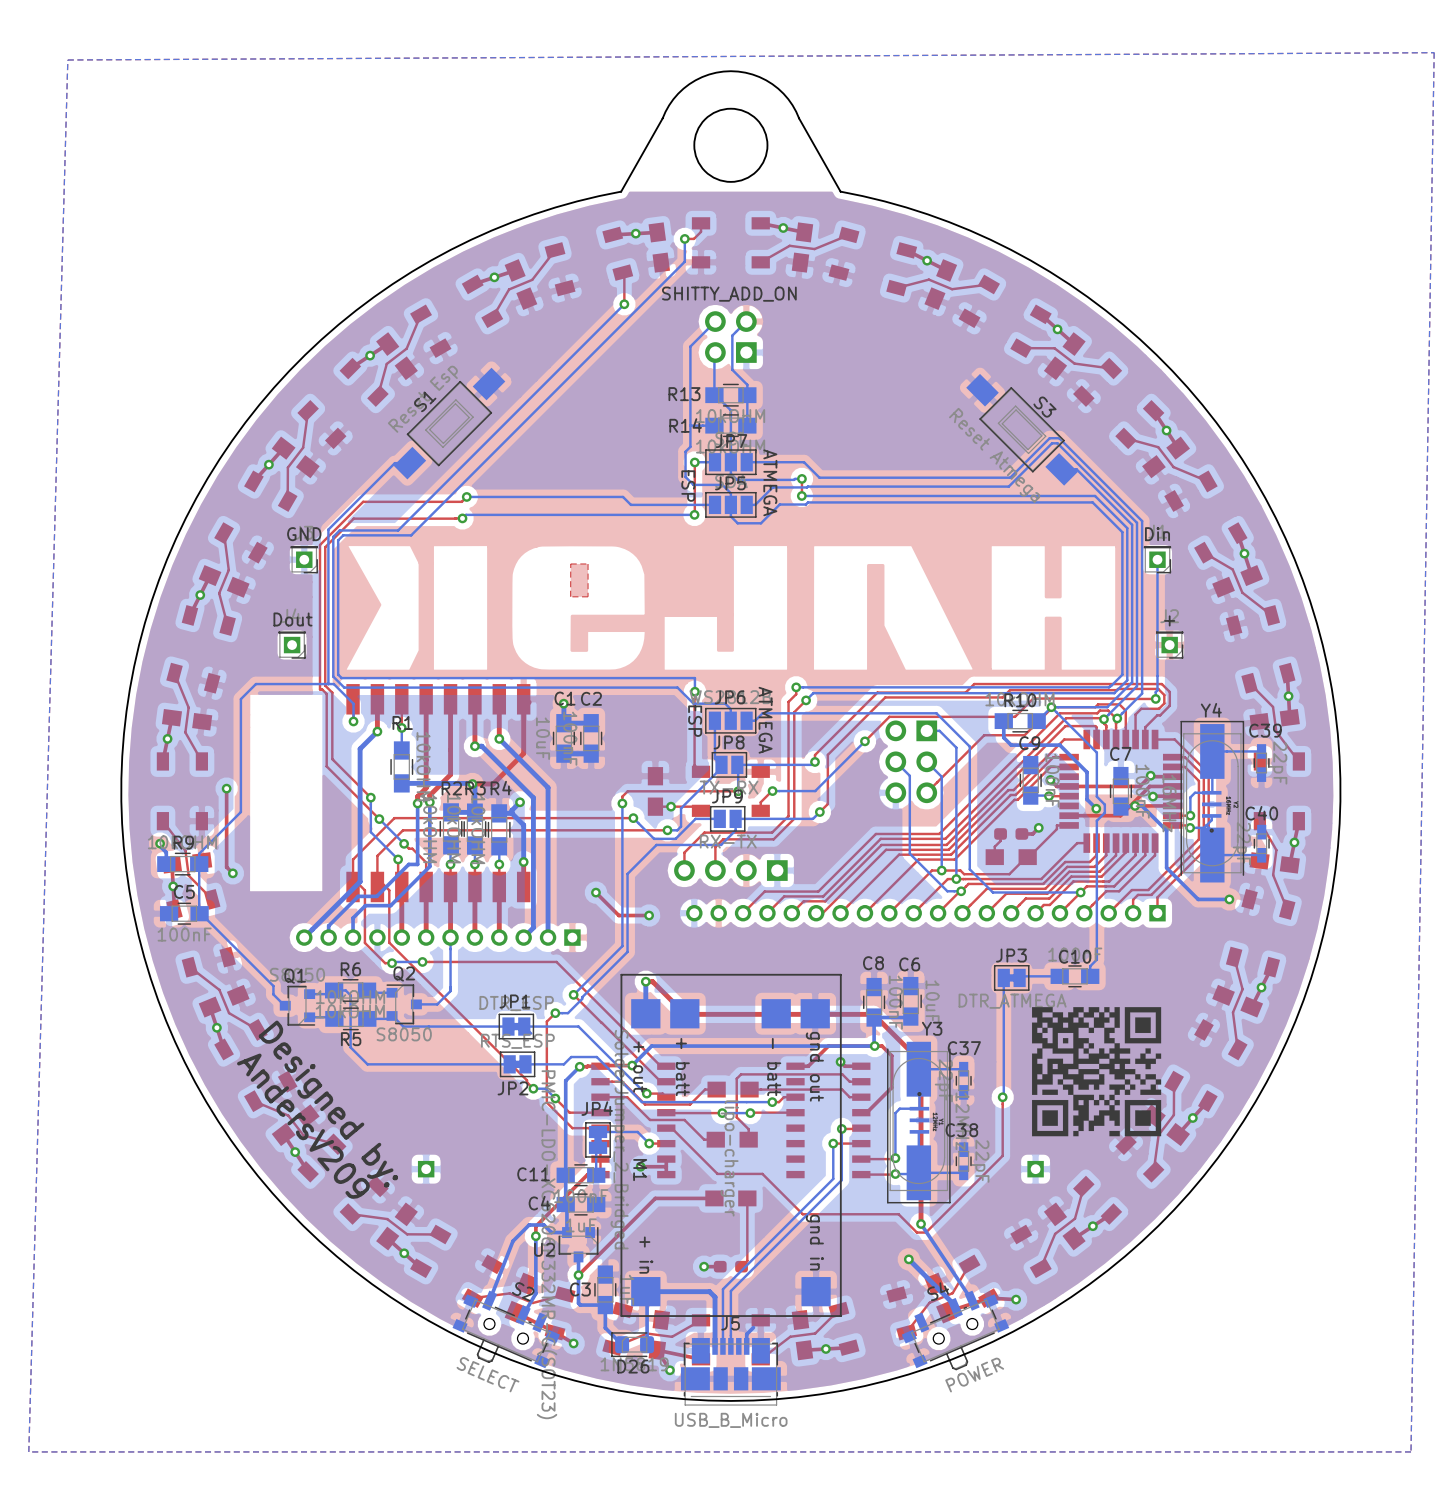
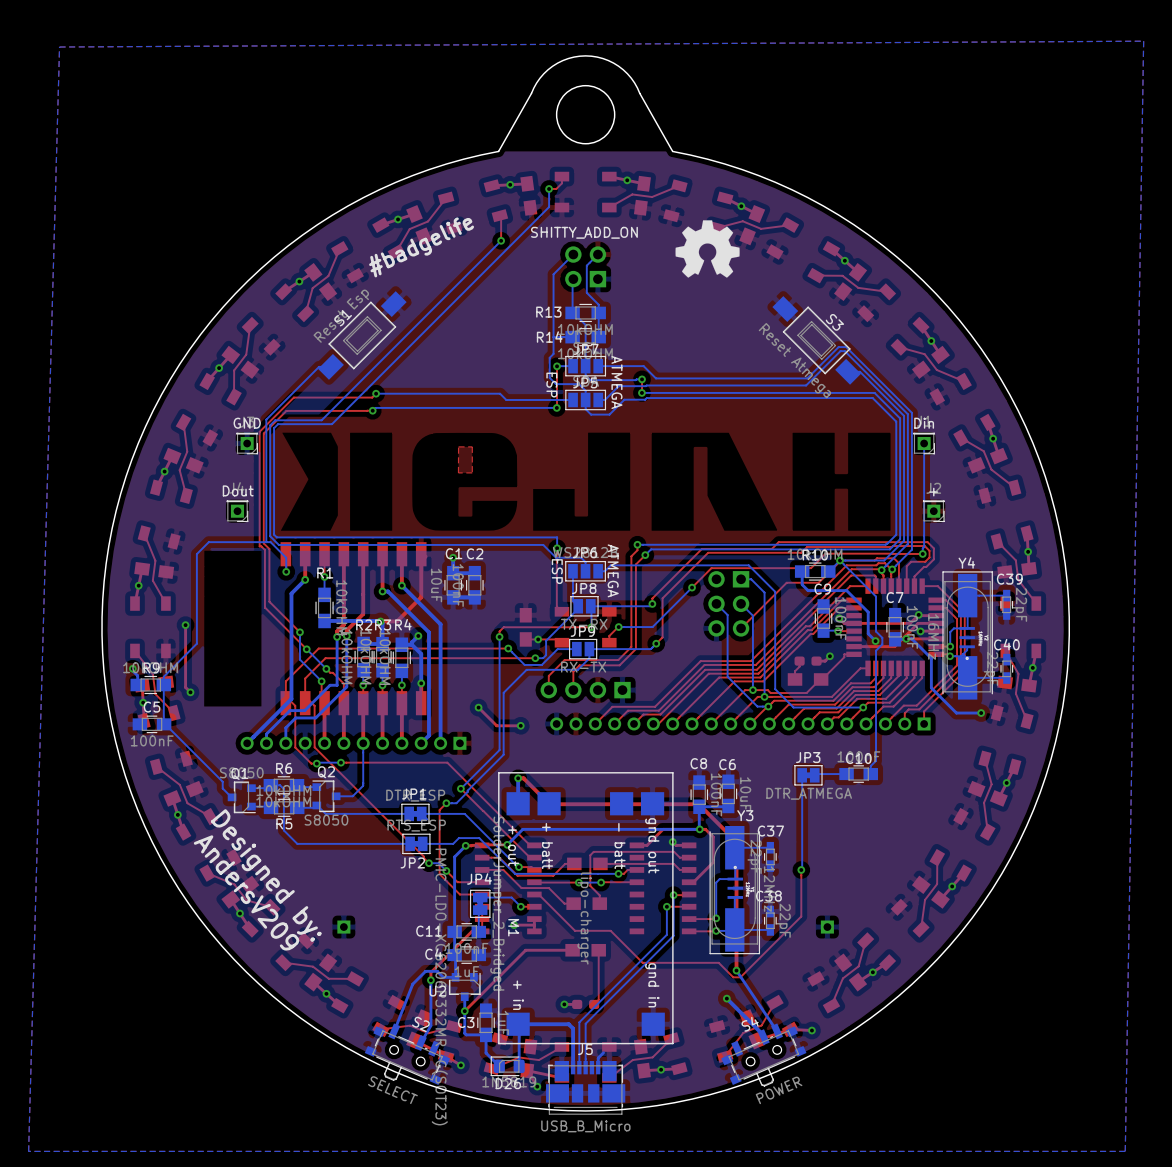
drawing: none -> [675, 220, 740, 278]
text: none -> #badgelife (421, 247)
drawing: [1031, 1007, 1162, 1137] -> none

